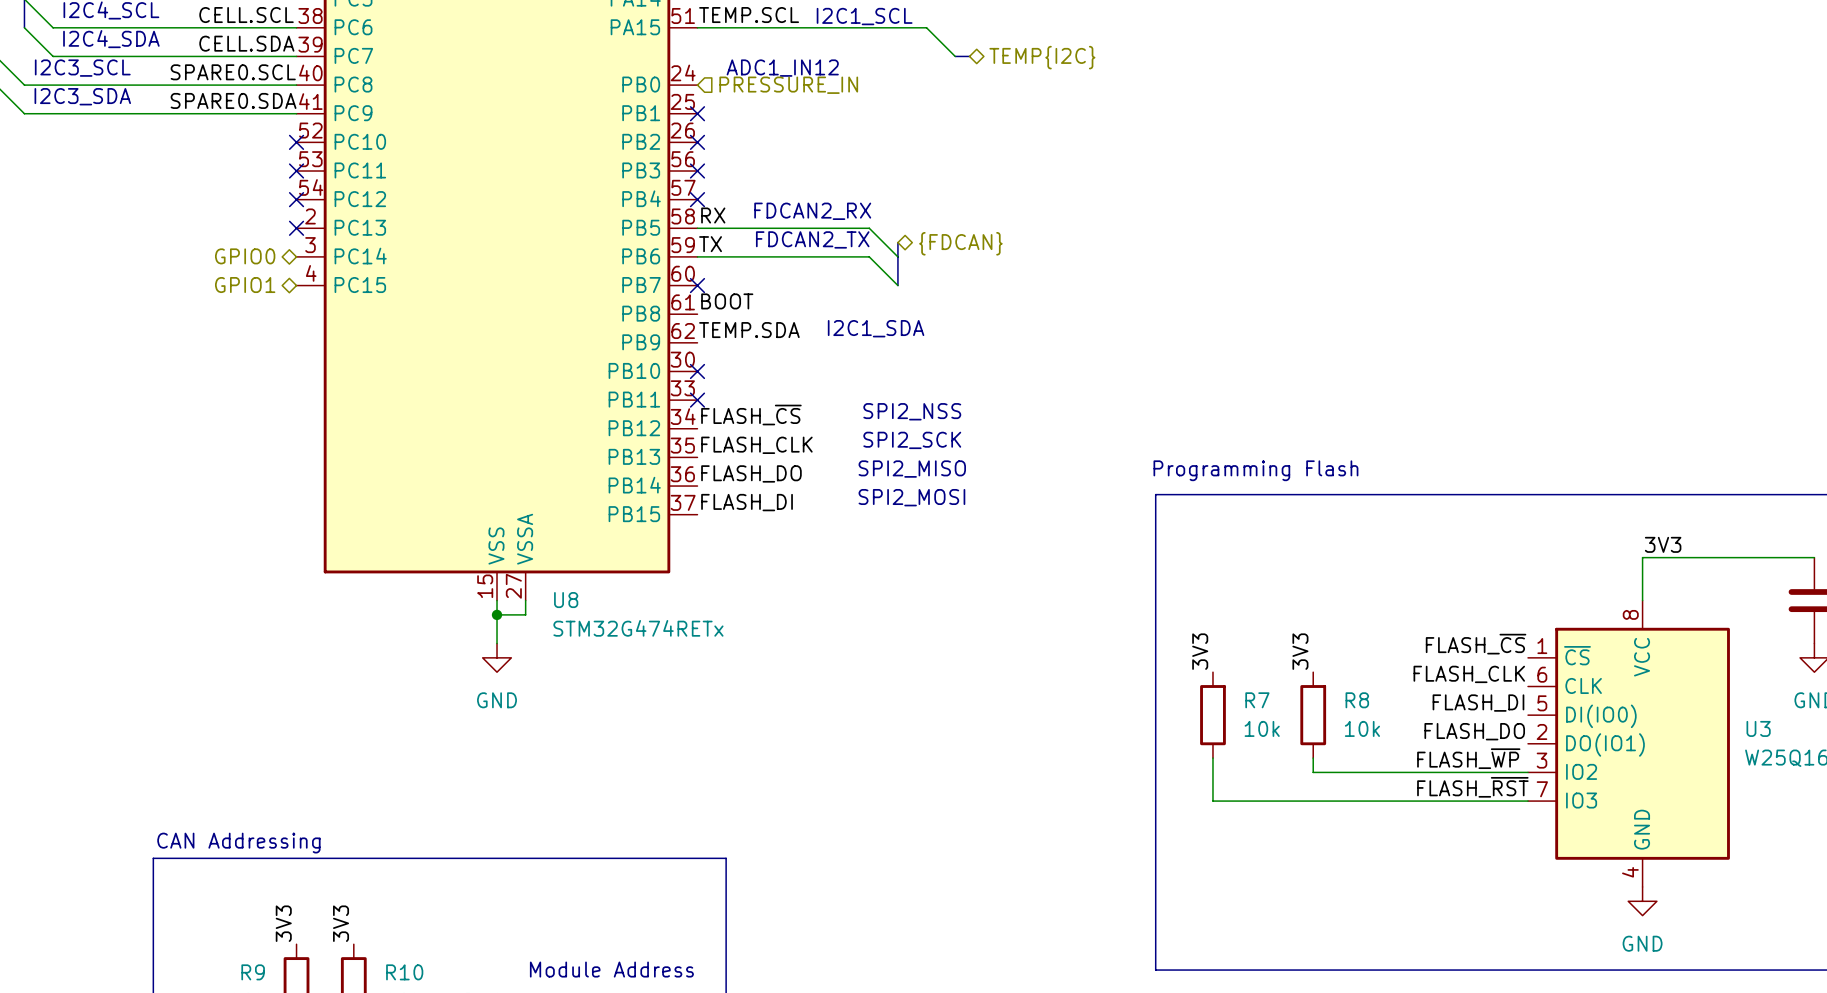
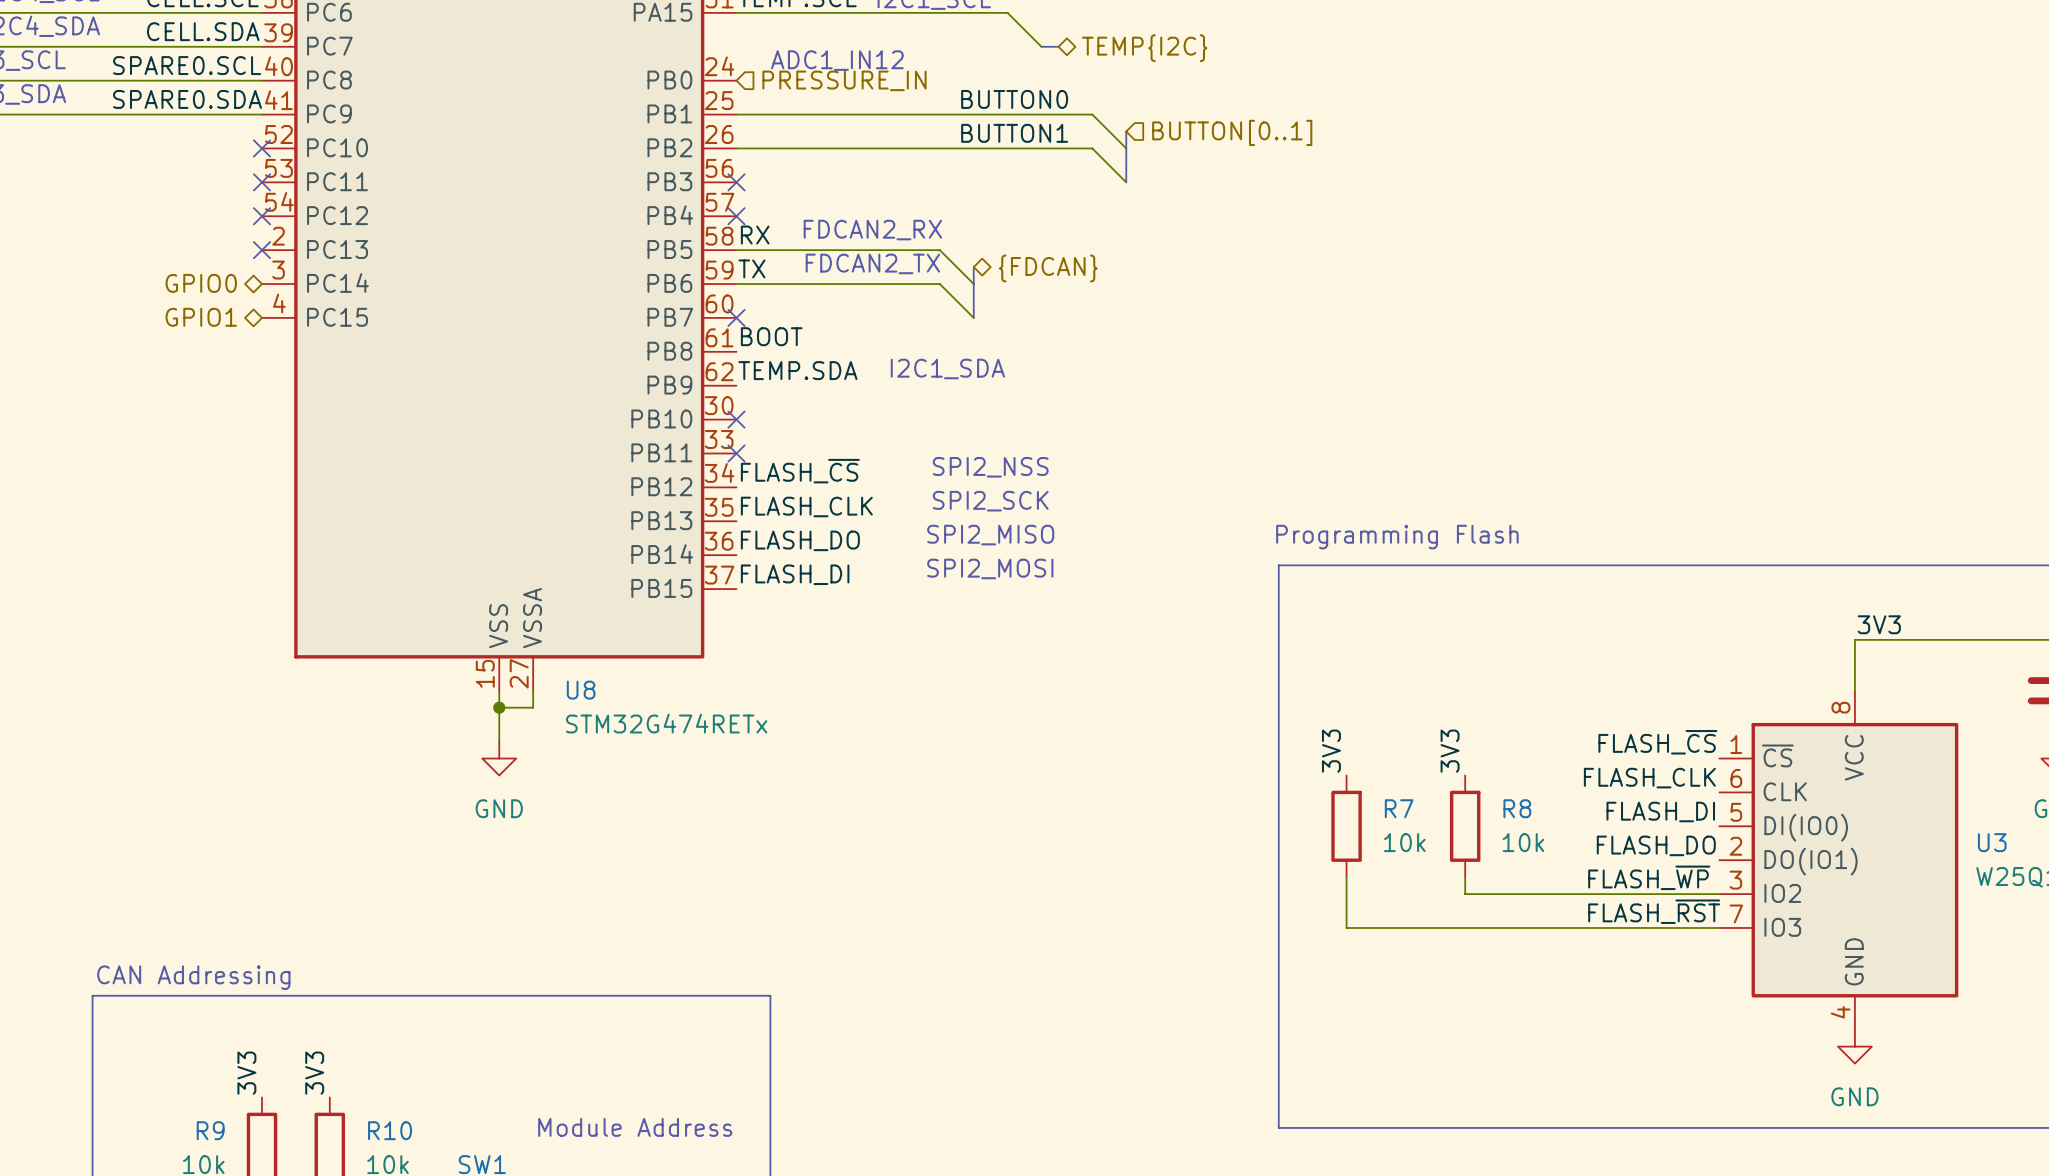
label: none -> BUTTON0 (1014, 99)
wire: none -> (736, 114) (1092, 114) (1126, 148)
no-connect mark: (697, 113) -> none
bus: none -> (1126, 131) (1126, 182)
label: none -> BUTTON1 (1014, 133)
hierarchical label: none -> BUTTON[0..1] (1232, 132)
wire: none -> (736, 148) (1092, 148) (1126, 182)
no-connect mark: (697, 142) -> none

